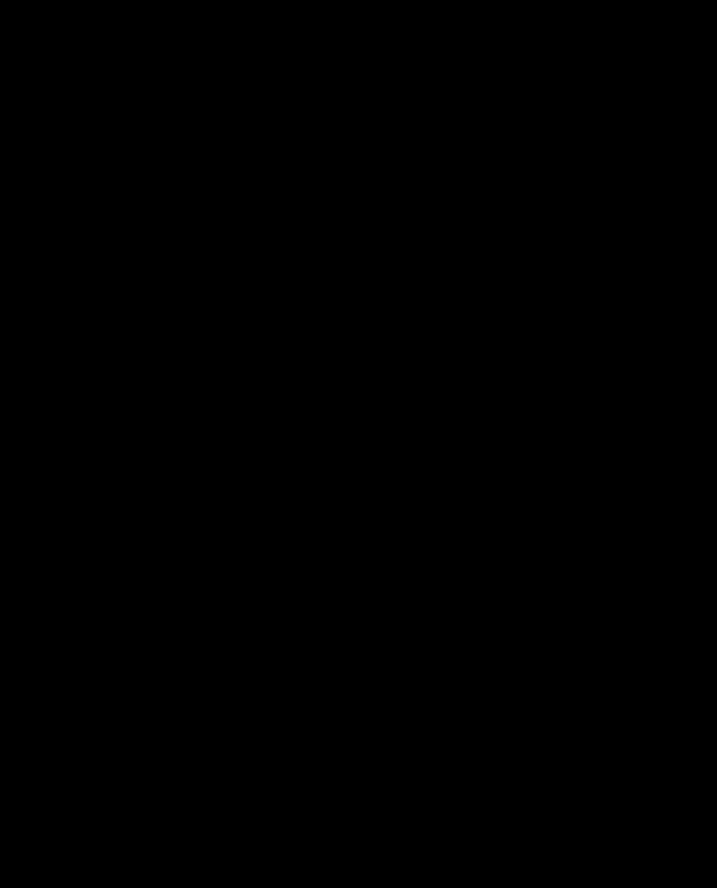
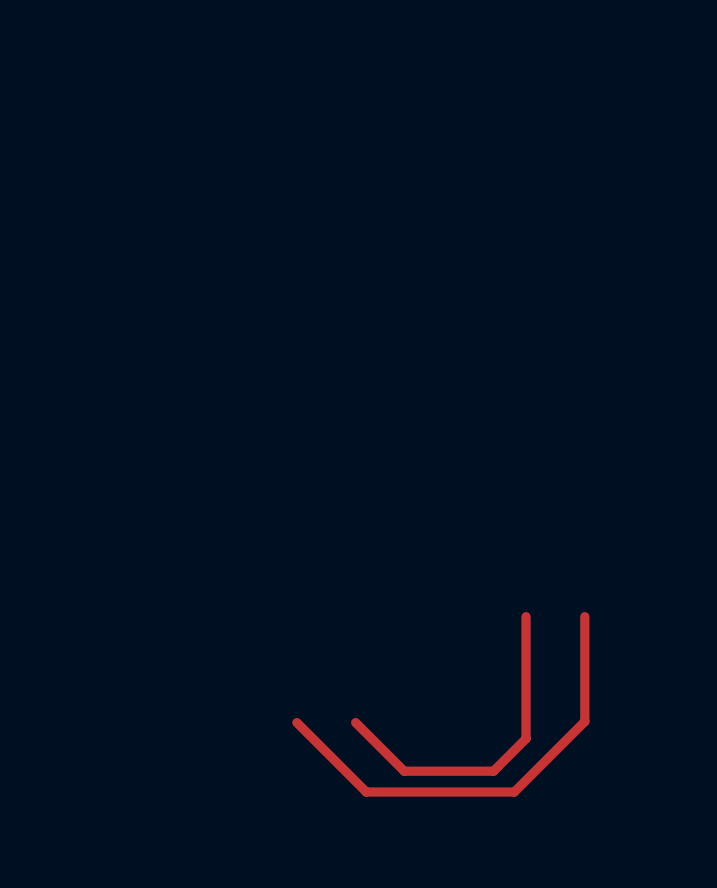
top track: none -> (526, 616) (526, 738) (493, 771) (404, 771) (355, 722)
top track: none -> (584, 616) (584, 721) (514, 792) (366, 792) (296, 722)

